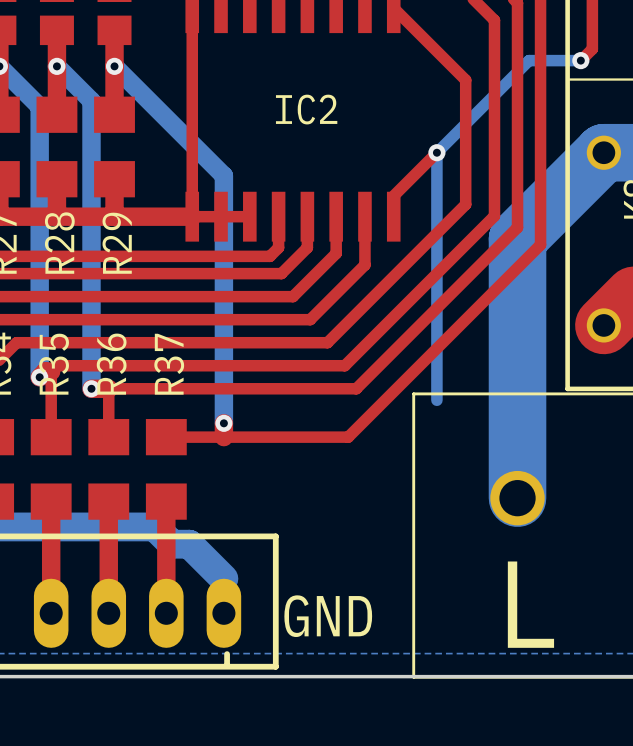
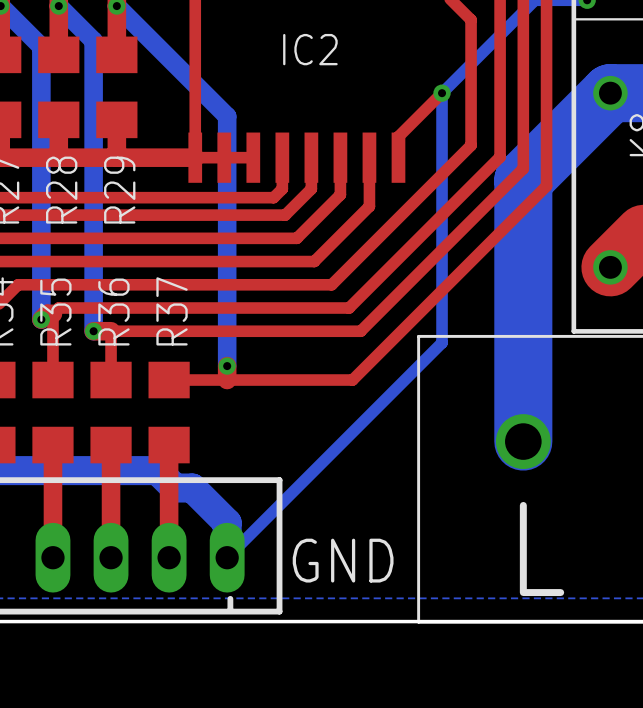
bottom track: none -> (442, 342) (227, 557) (227, 522)

